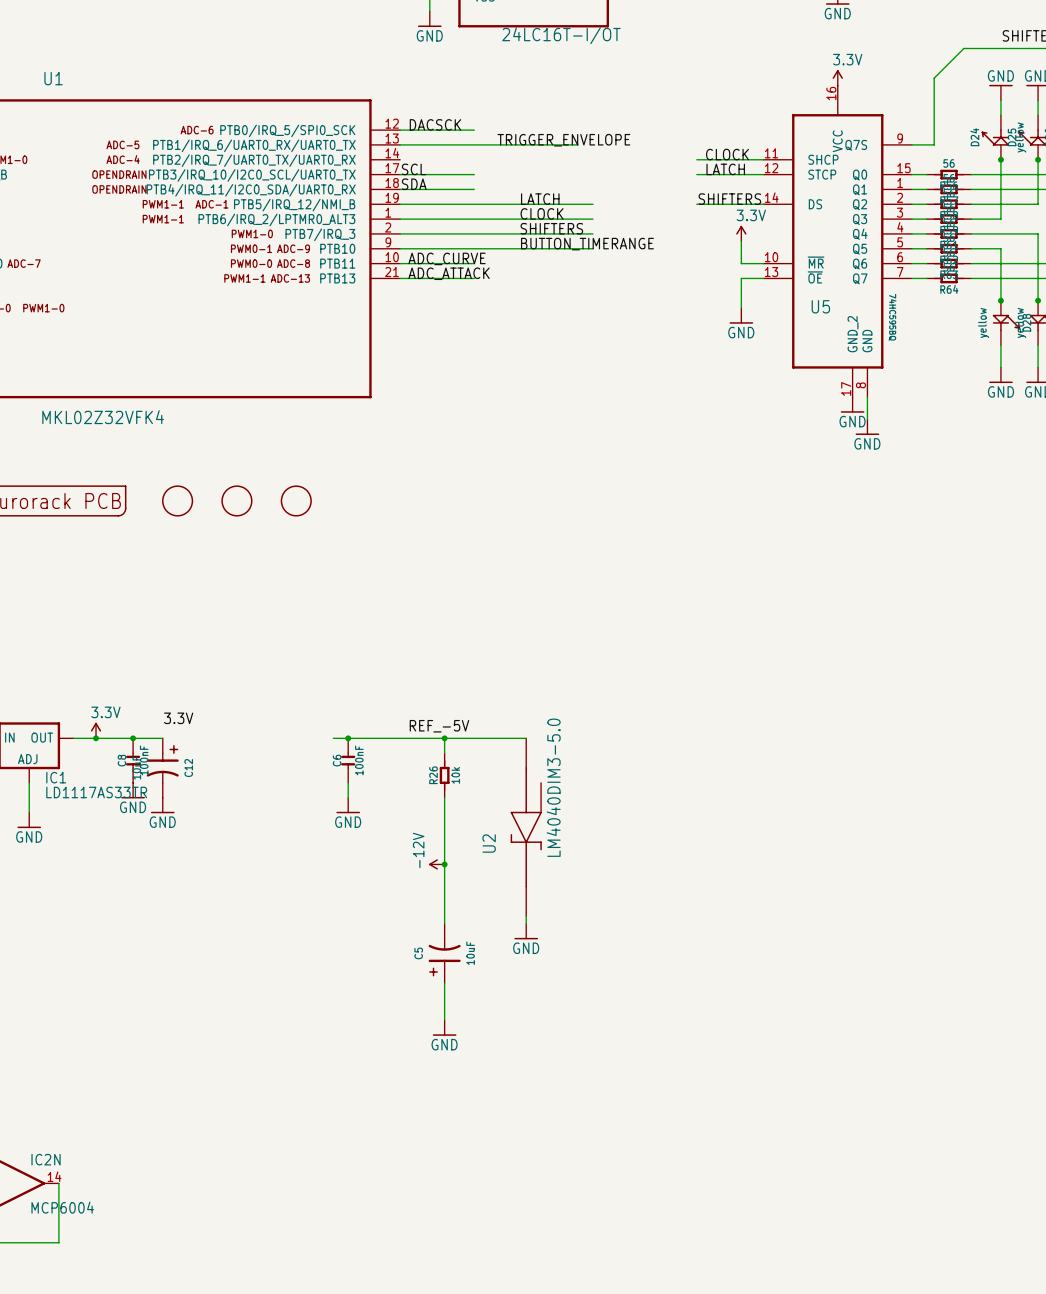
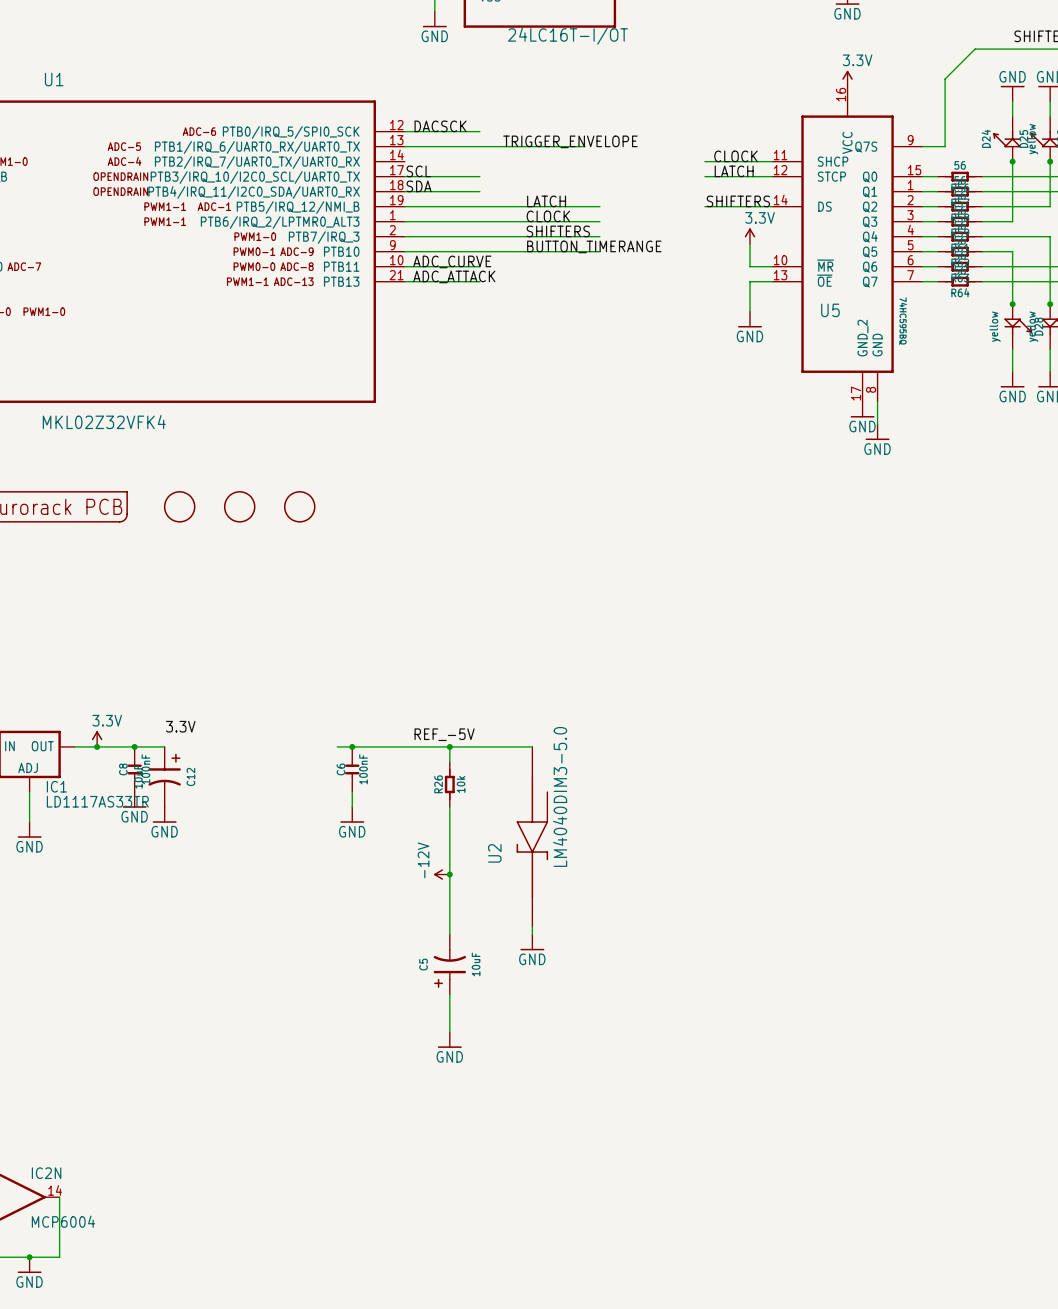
junction: none -> (29, 1257)
power symbol: none -> GND (29, 1265)

